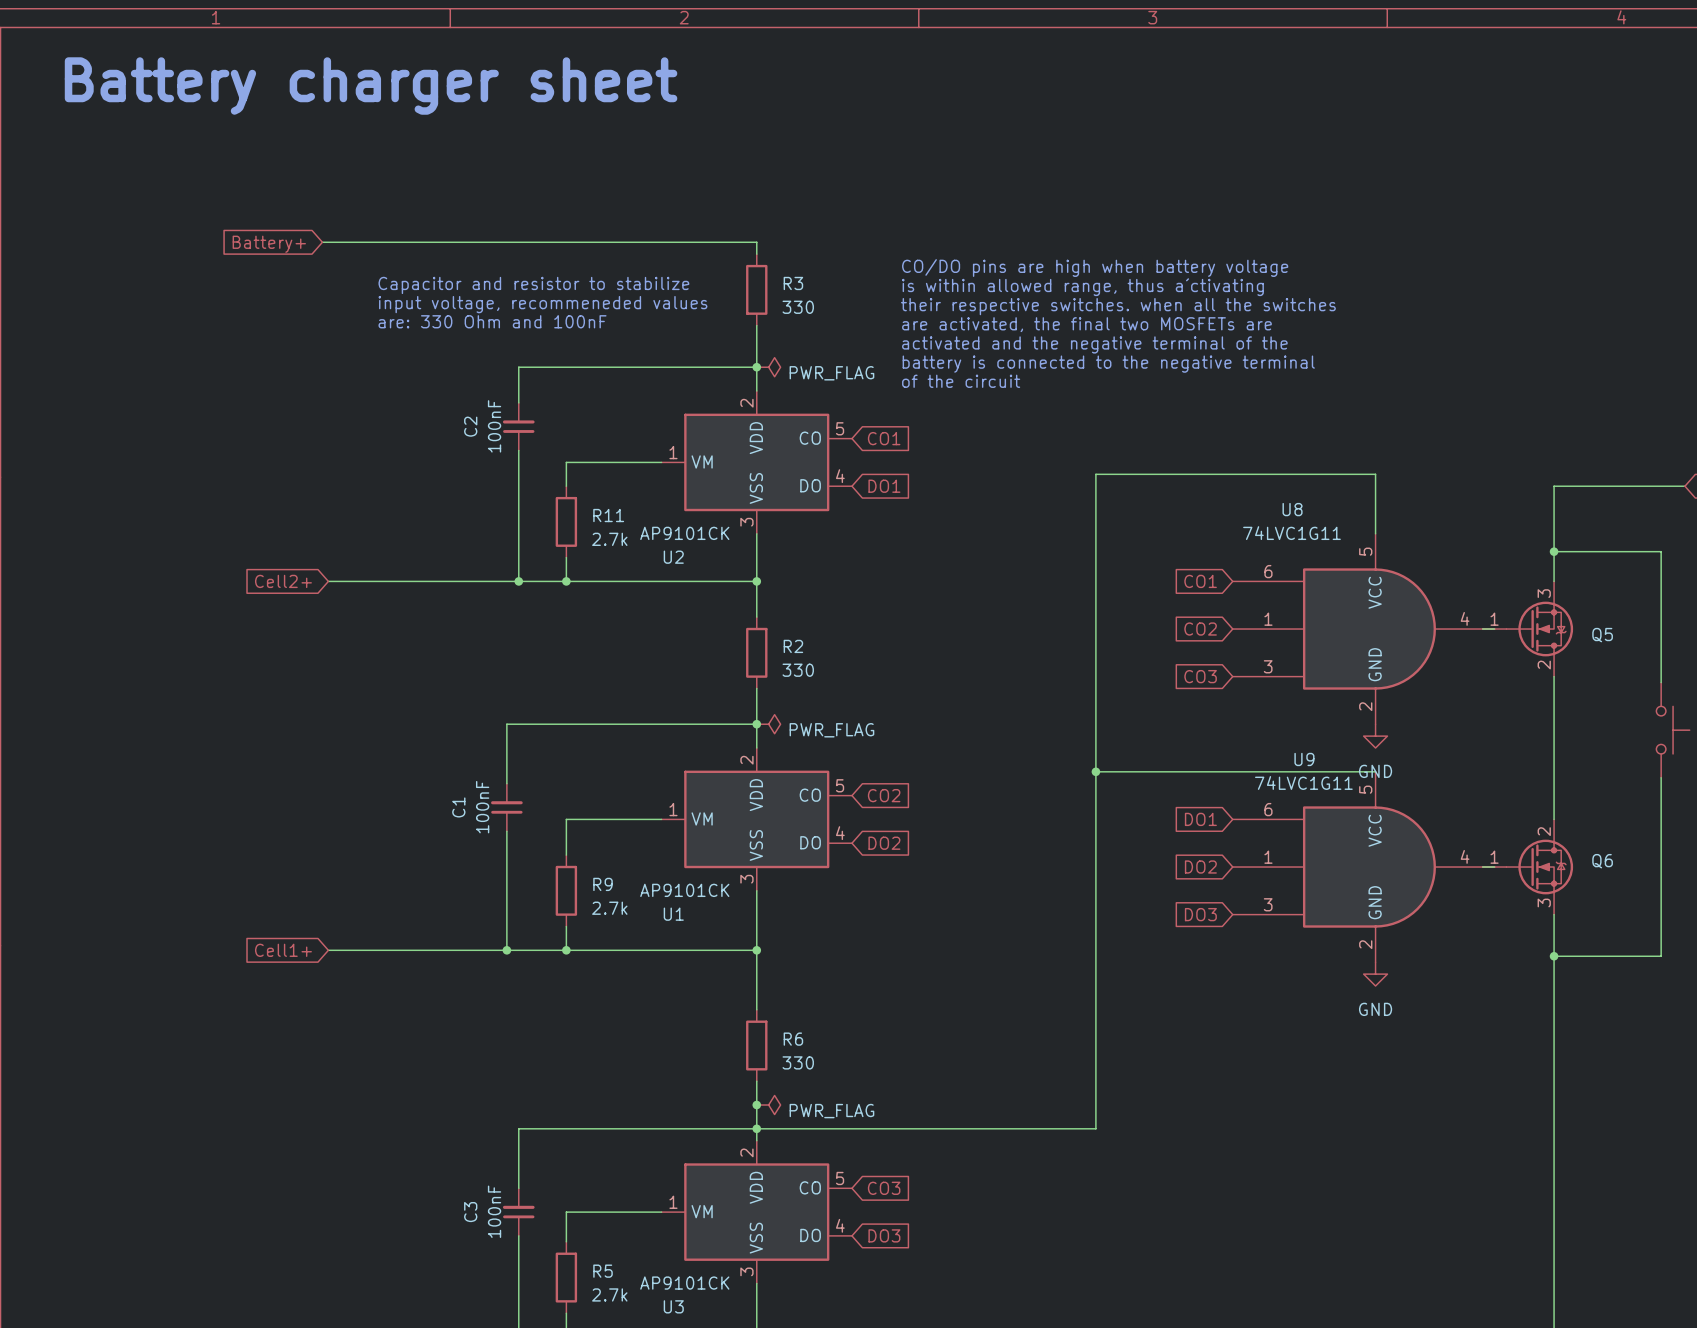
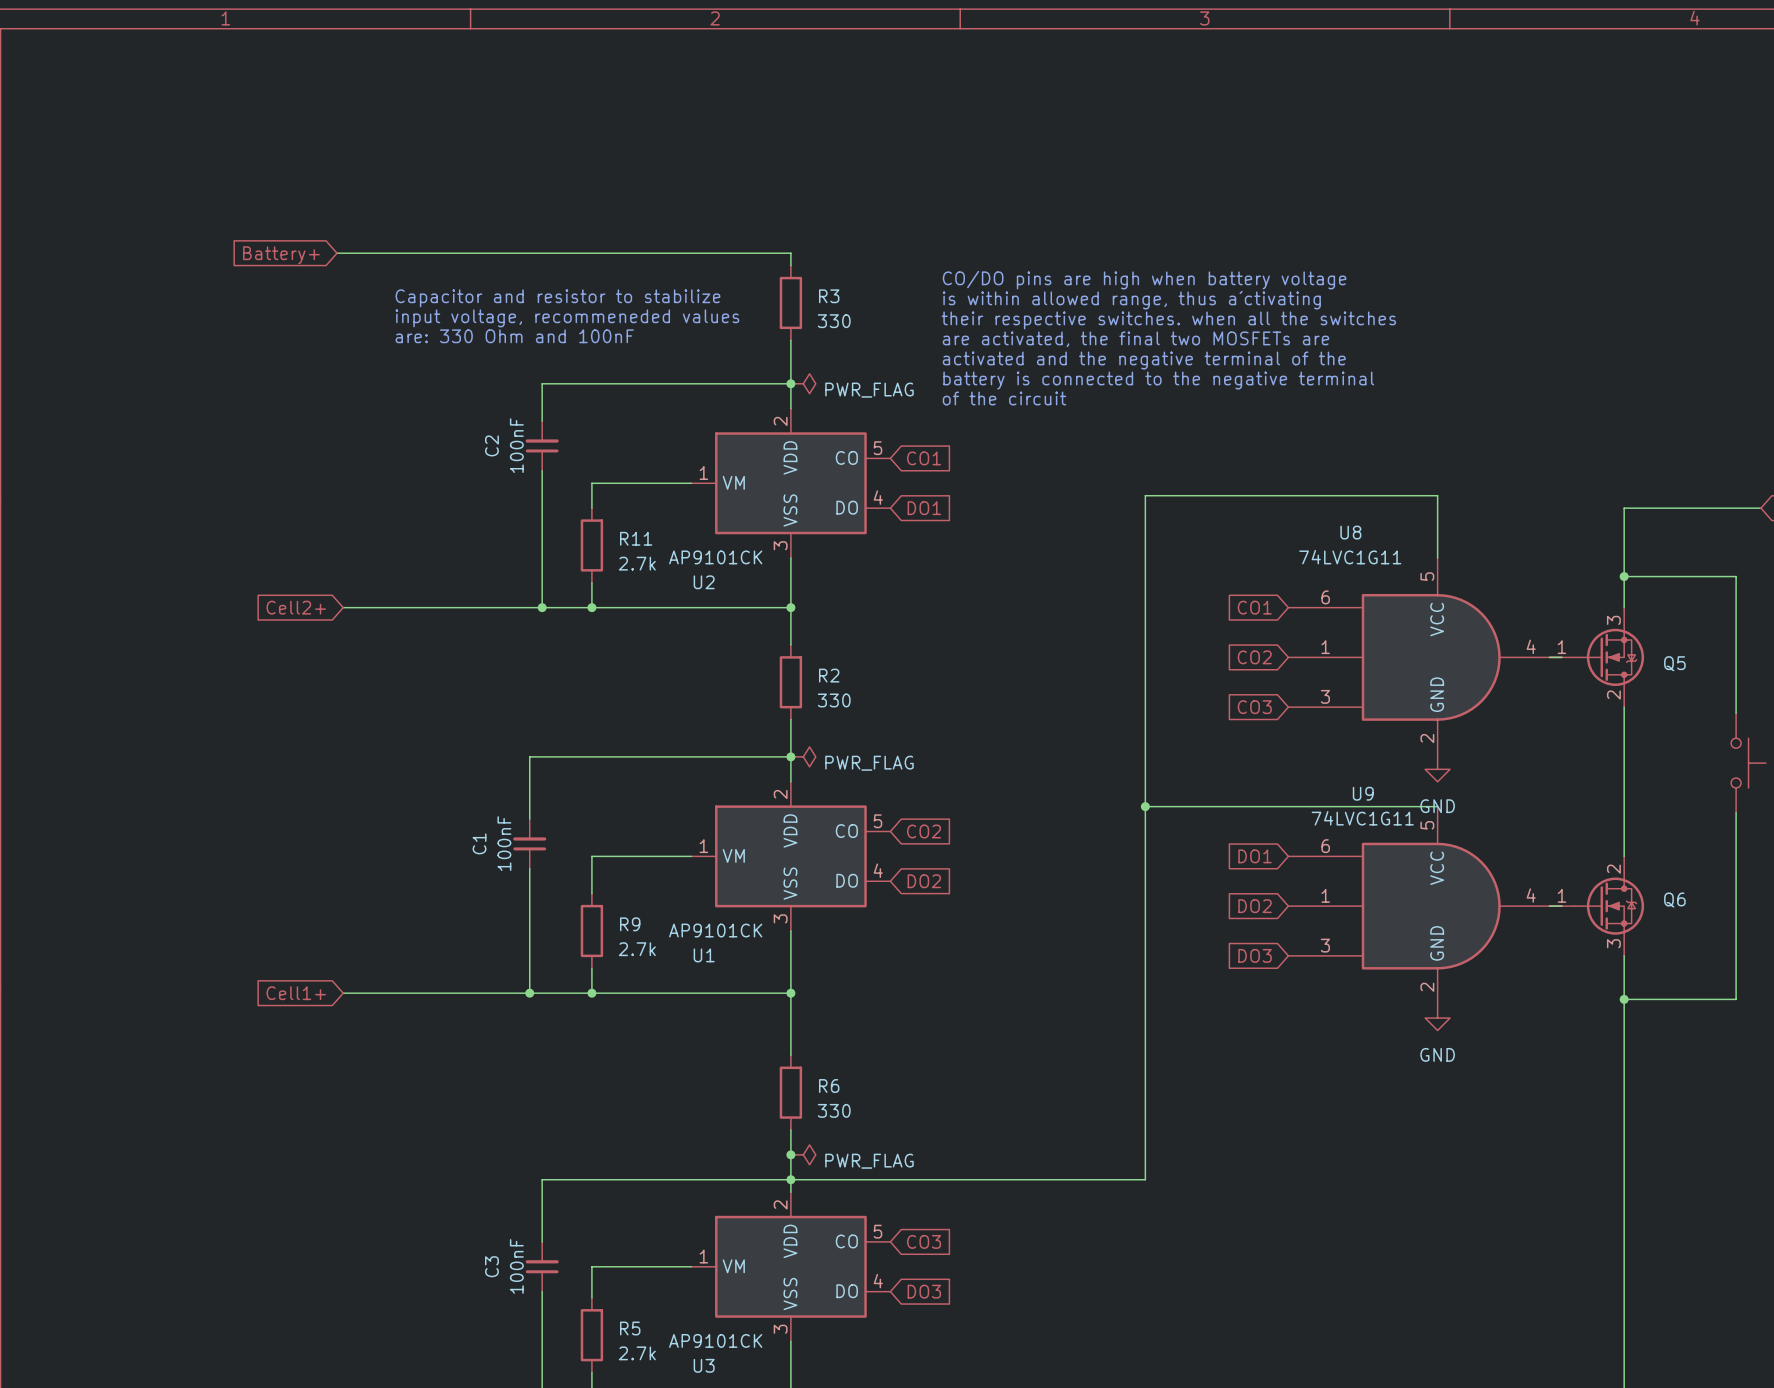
text: Battery charger sheet (371, 86) -> none

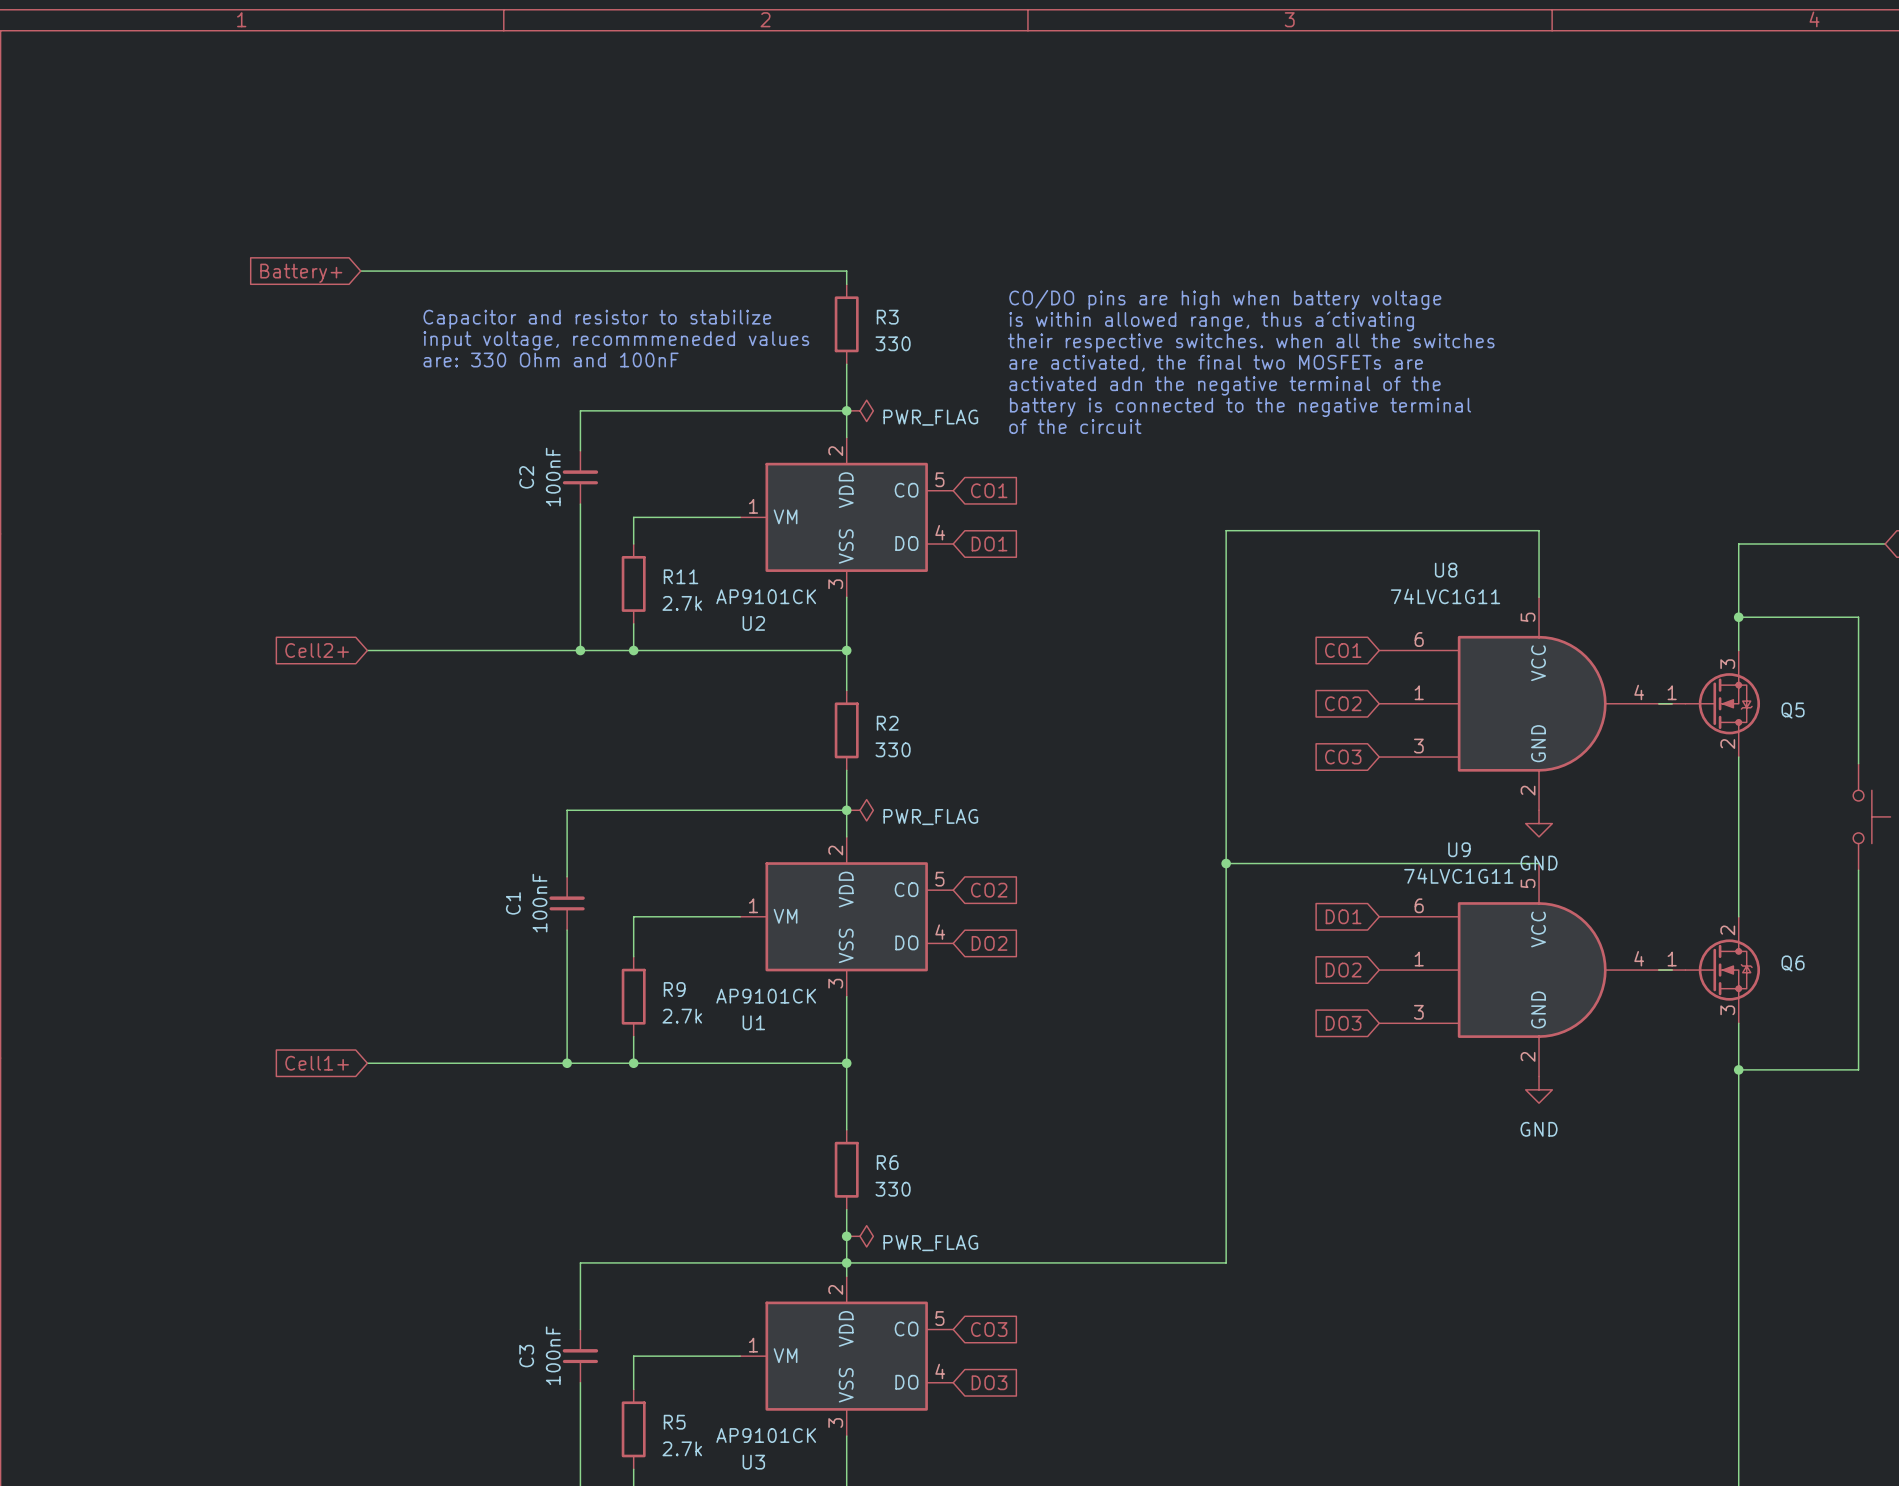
text: input voltage, recommeneded values (567, 318) -> input voltage, recommmeneded values (616, 340)
text: activated and the negative terminal of the (1144, 360) -> activated adn the negative terminal of the (1224, 385)

